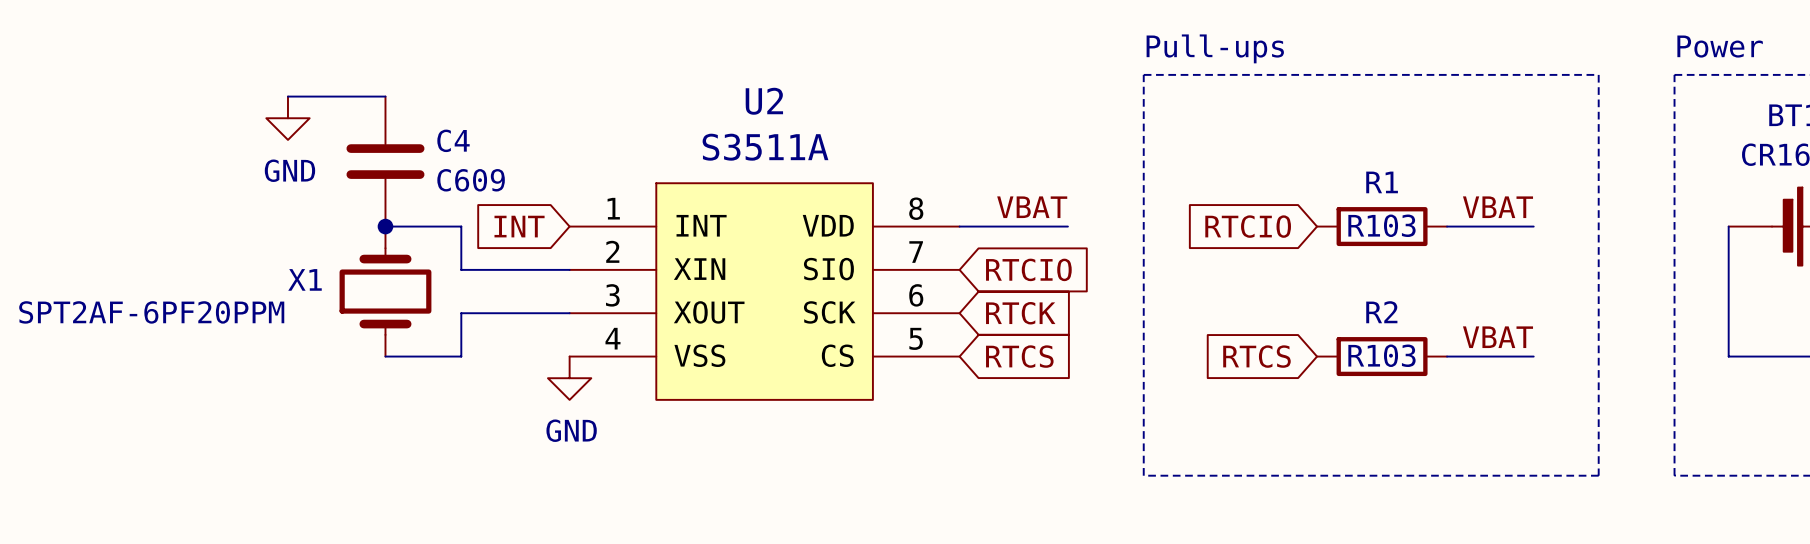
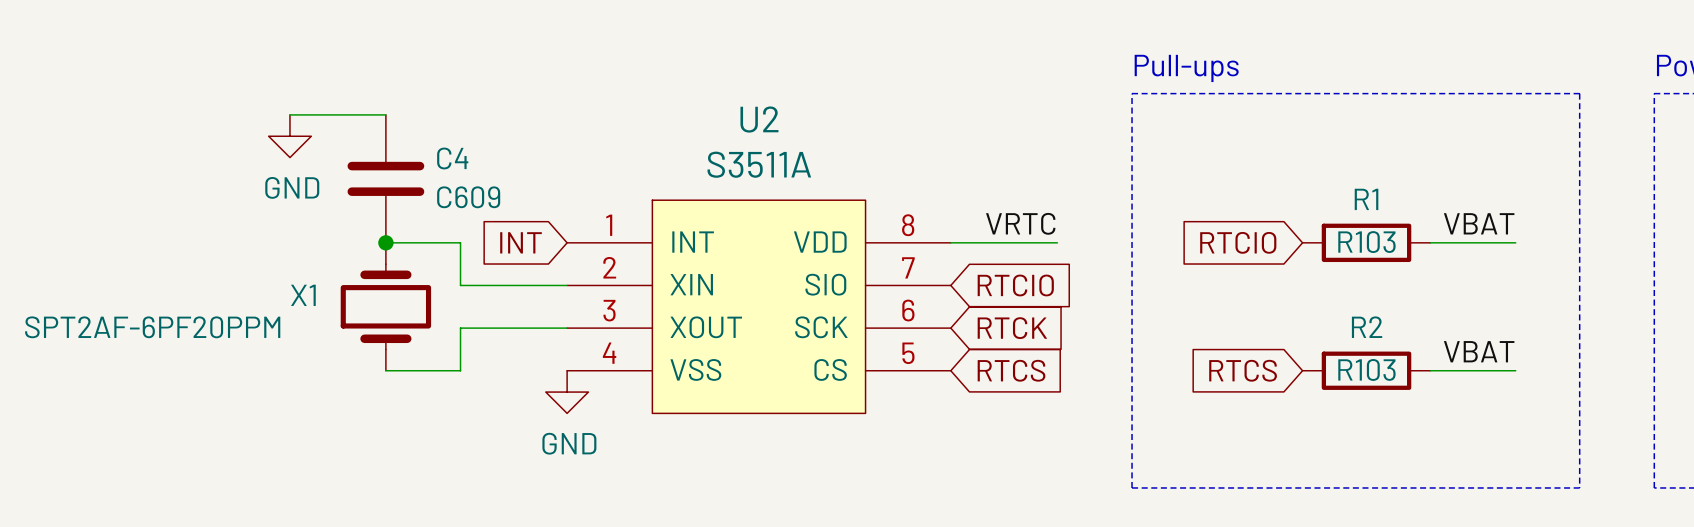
label: VBAT (1032, 207) -> VRTC (1020, 223)

